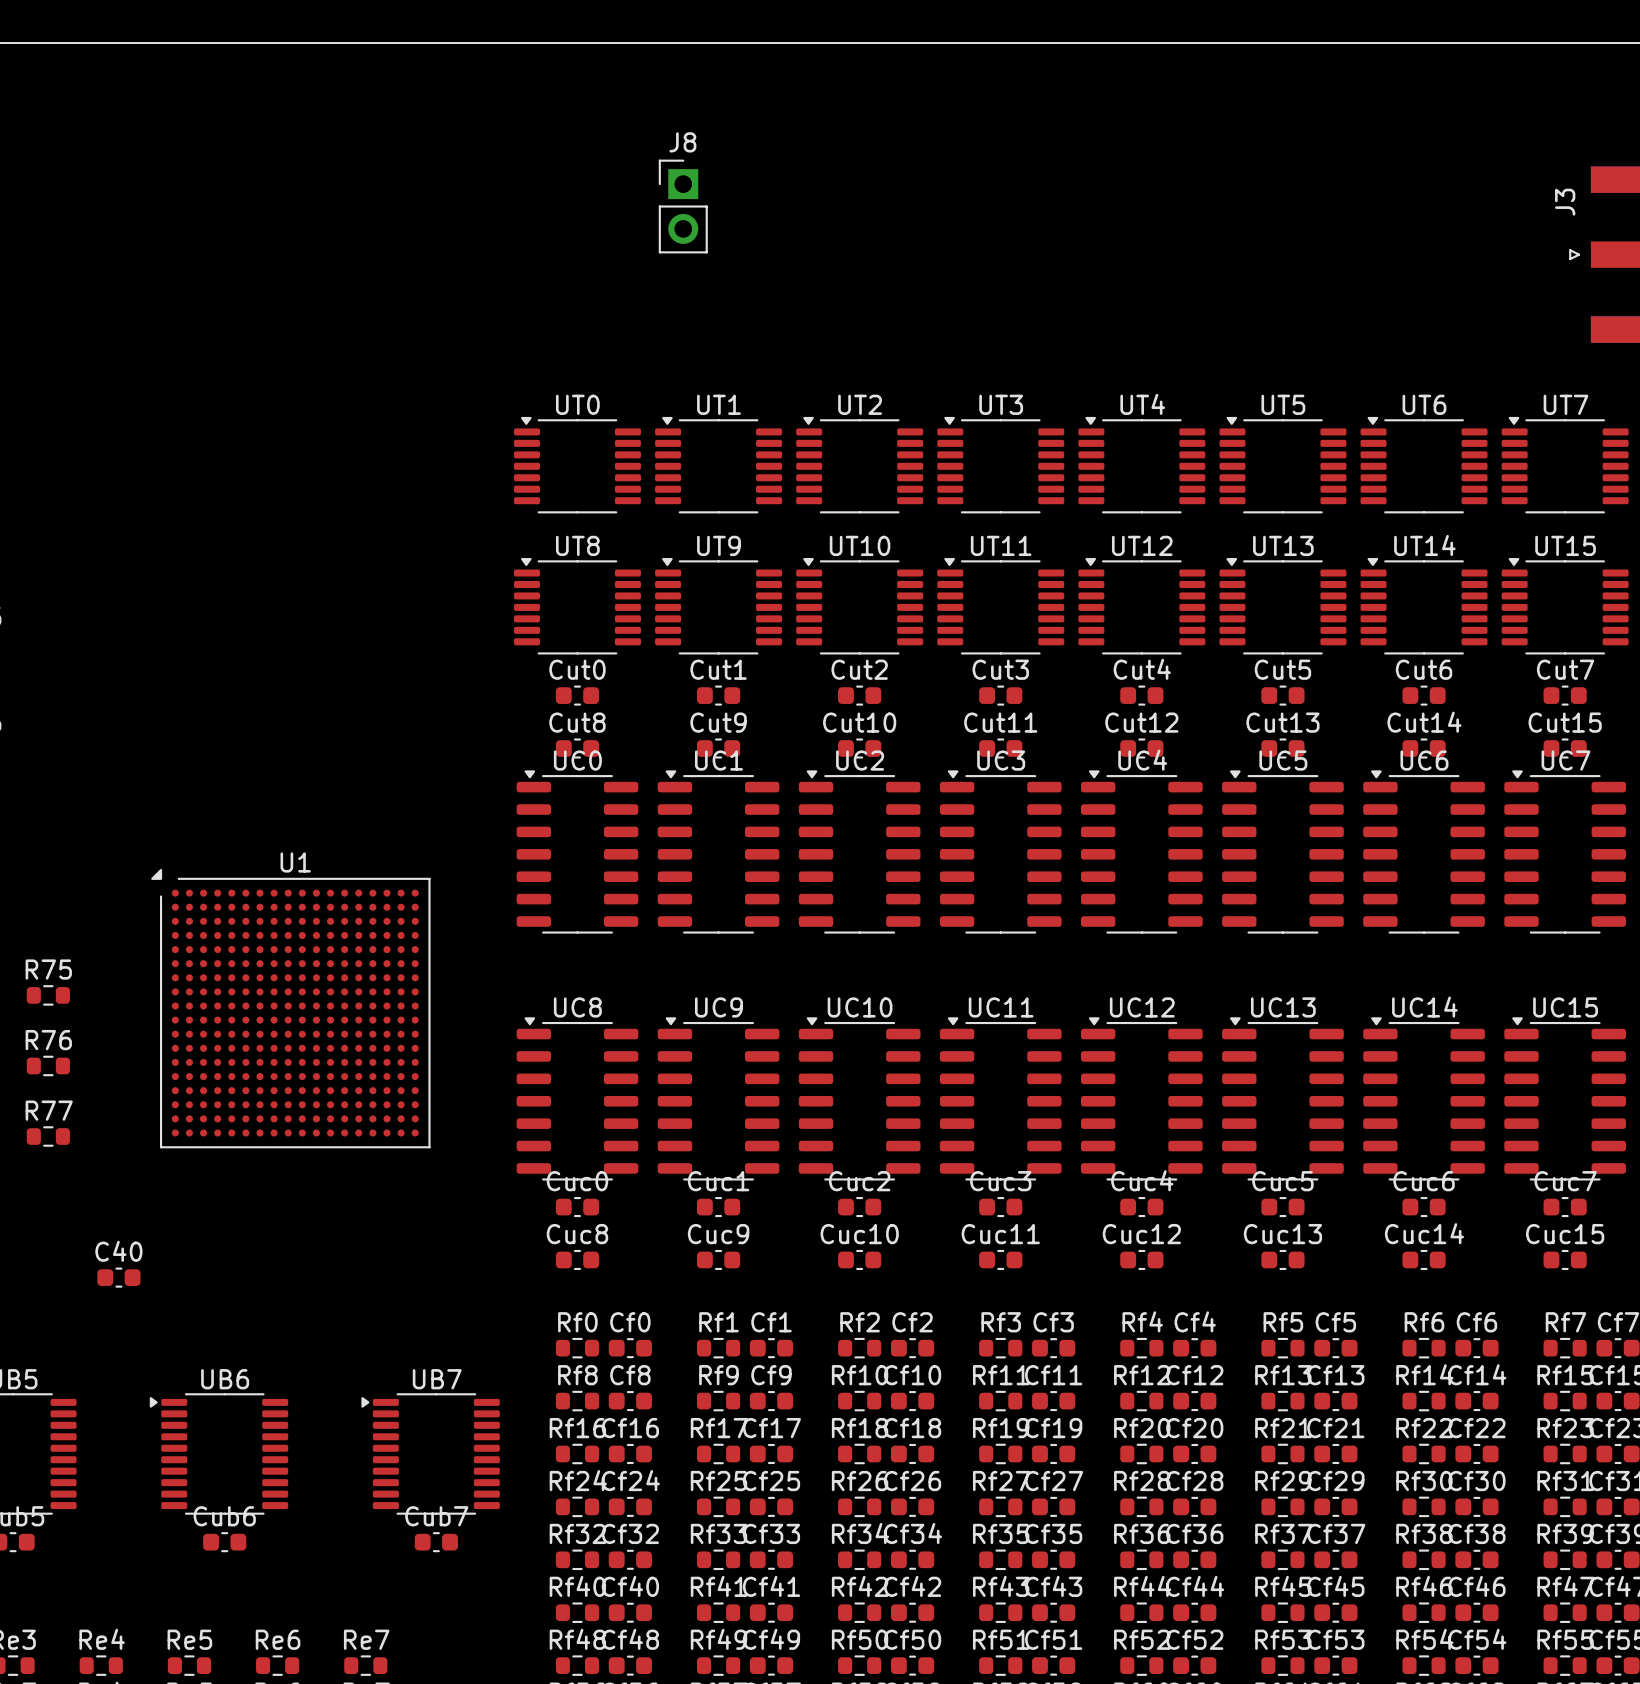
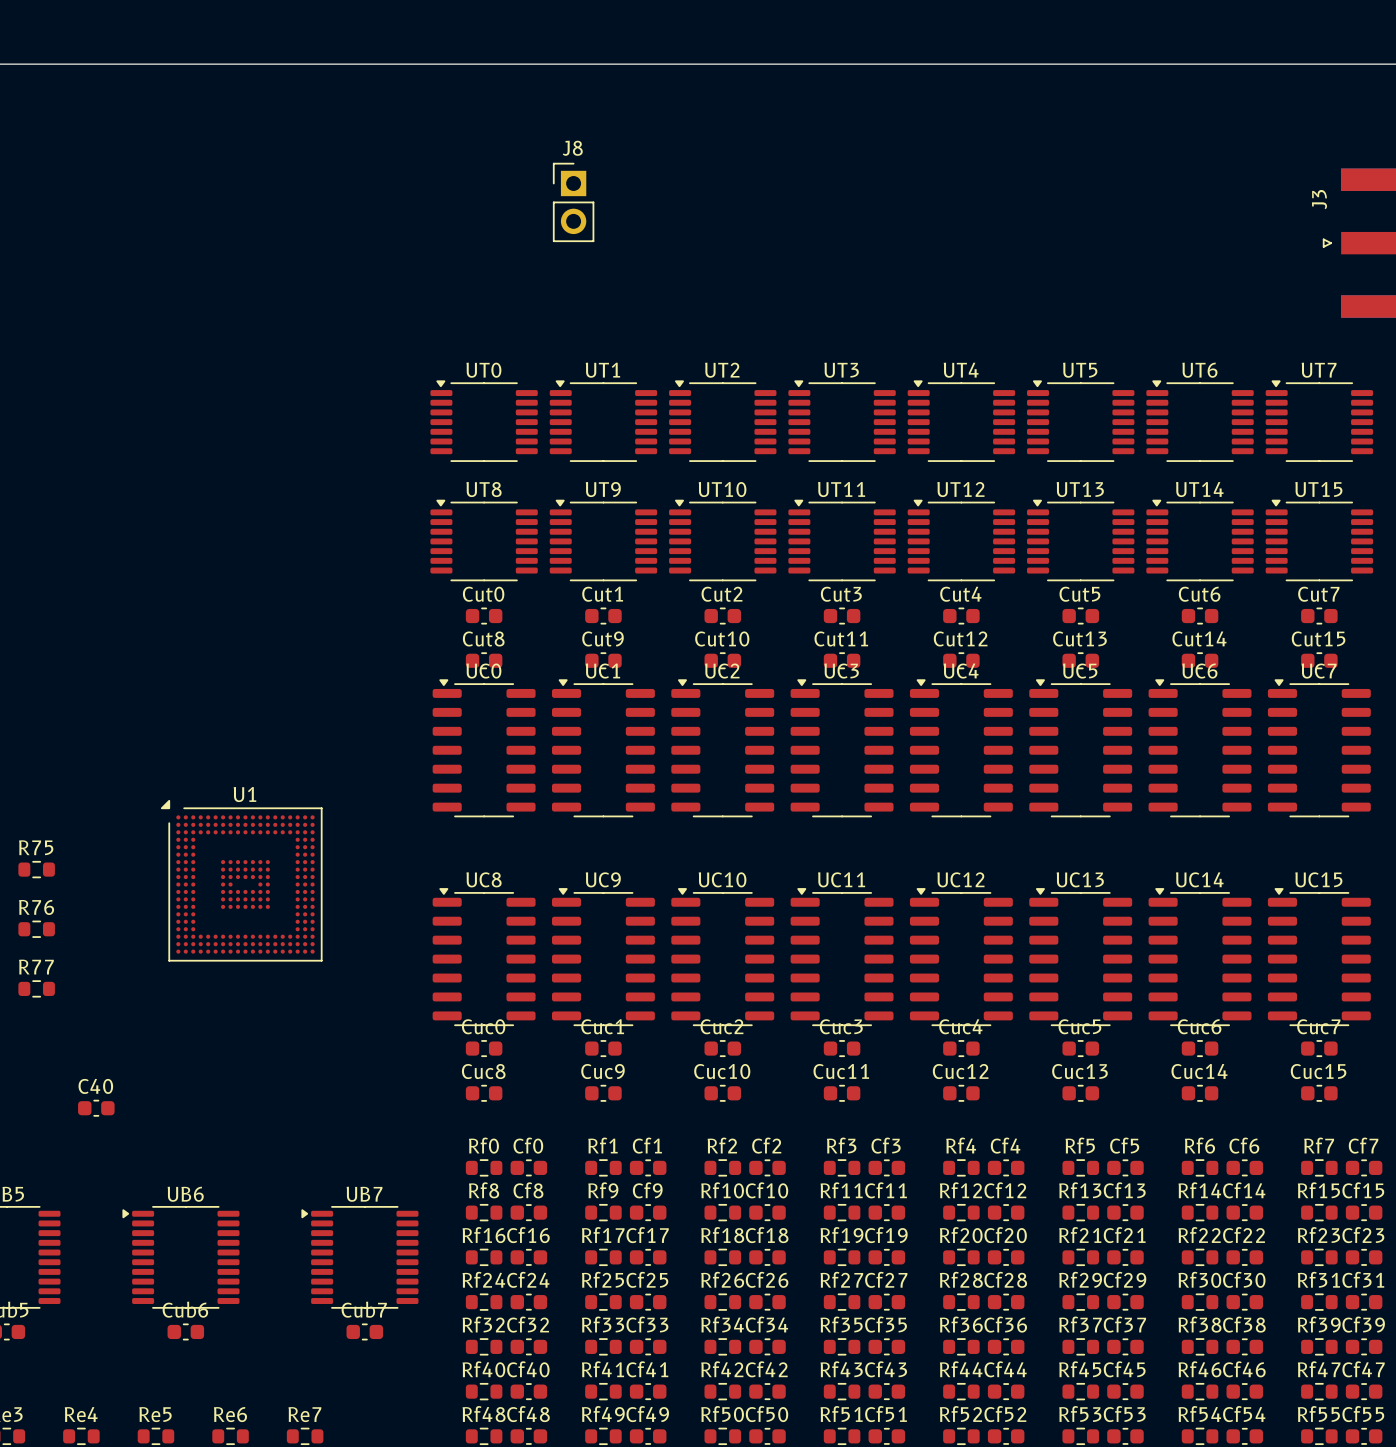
U1 name position: U1 (295, 862) -> U1 (244, 794)
U1 footprint: [151, 868, 431, 1149] -> [160, 799, 323, 962]

